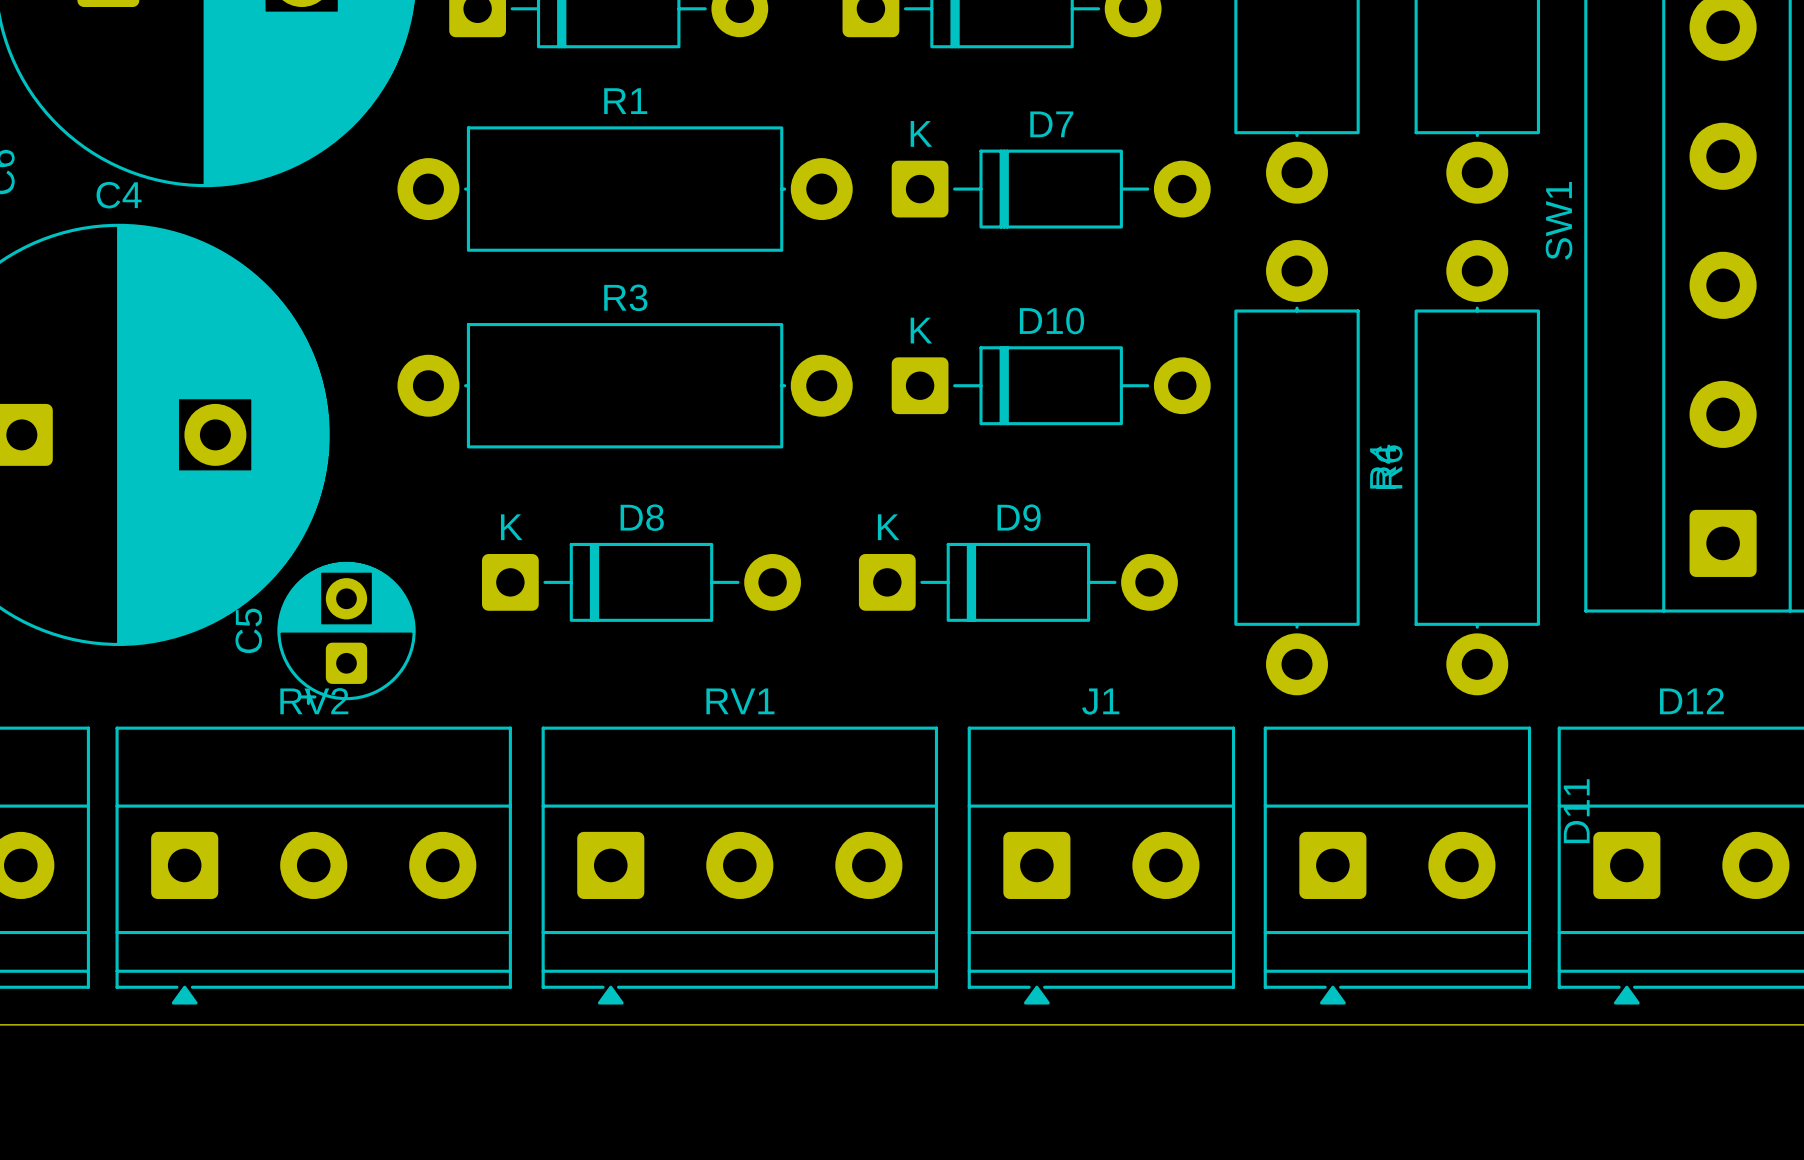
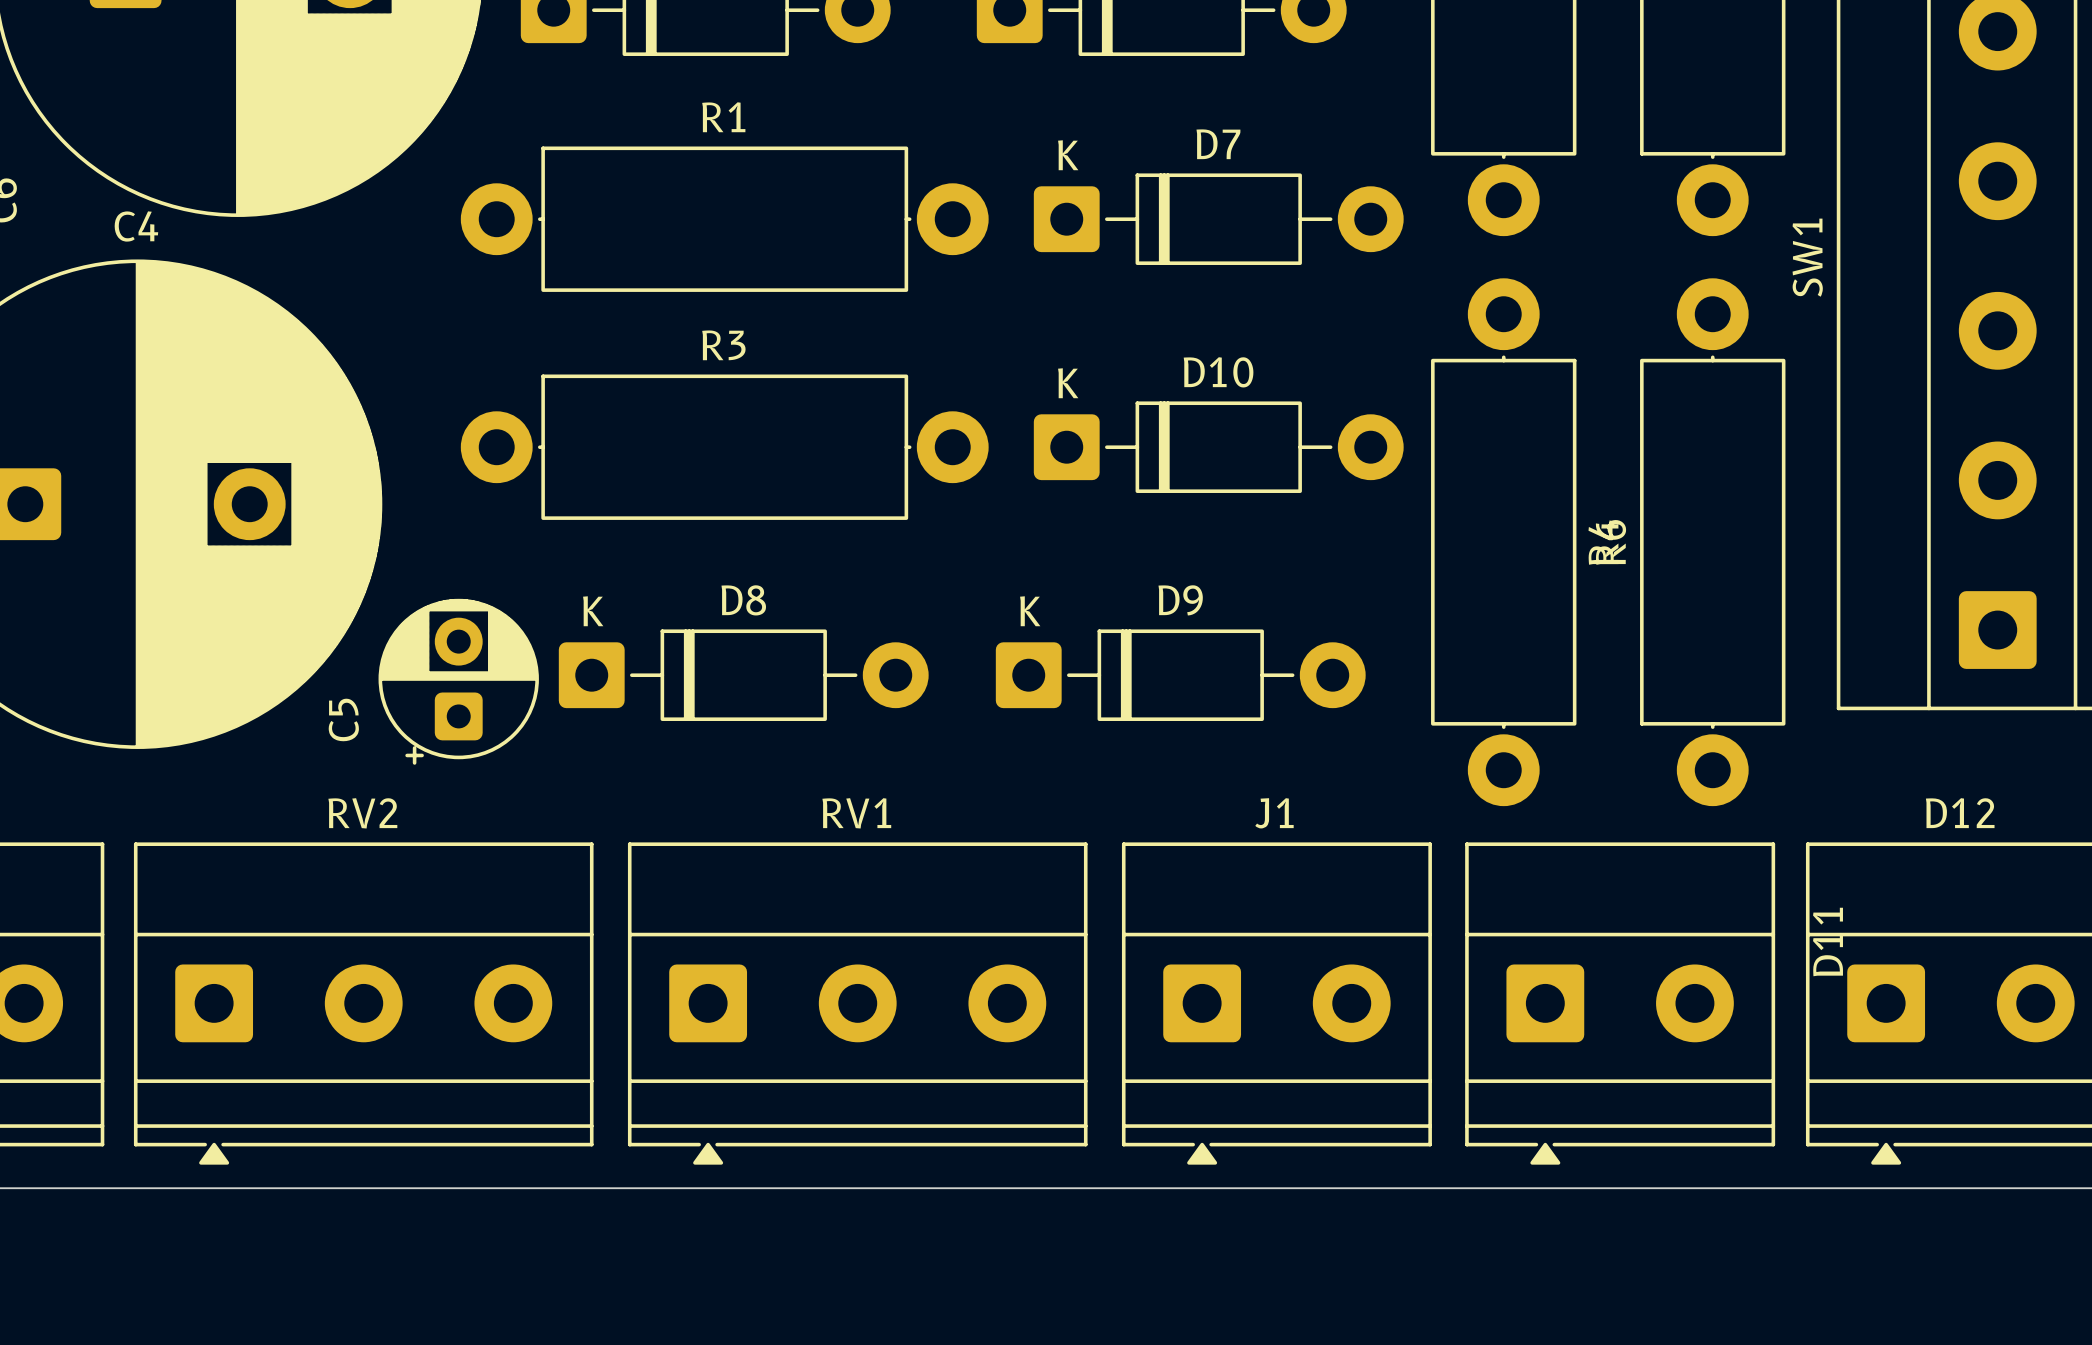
C5 name position: C5 (248, 630) -> C5 (343, 719)
C5 position: (346, 633) -> (458, 681)

